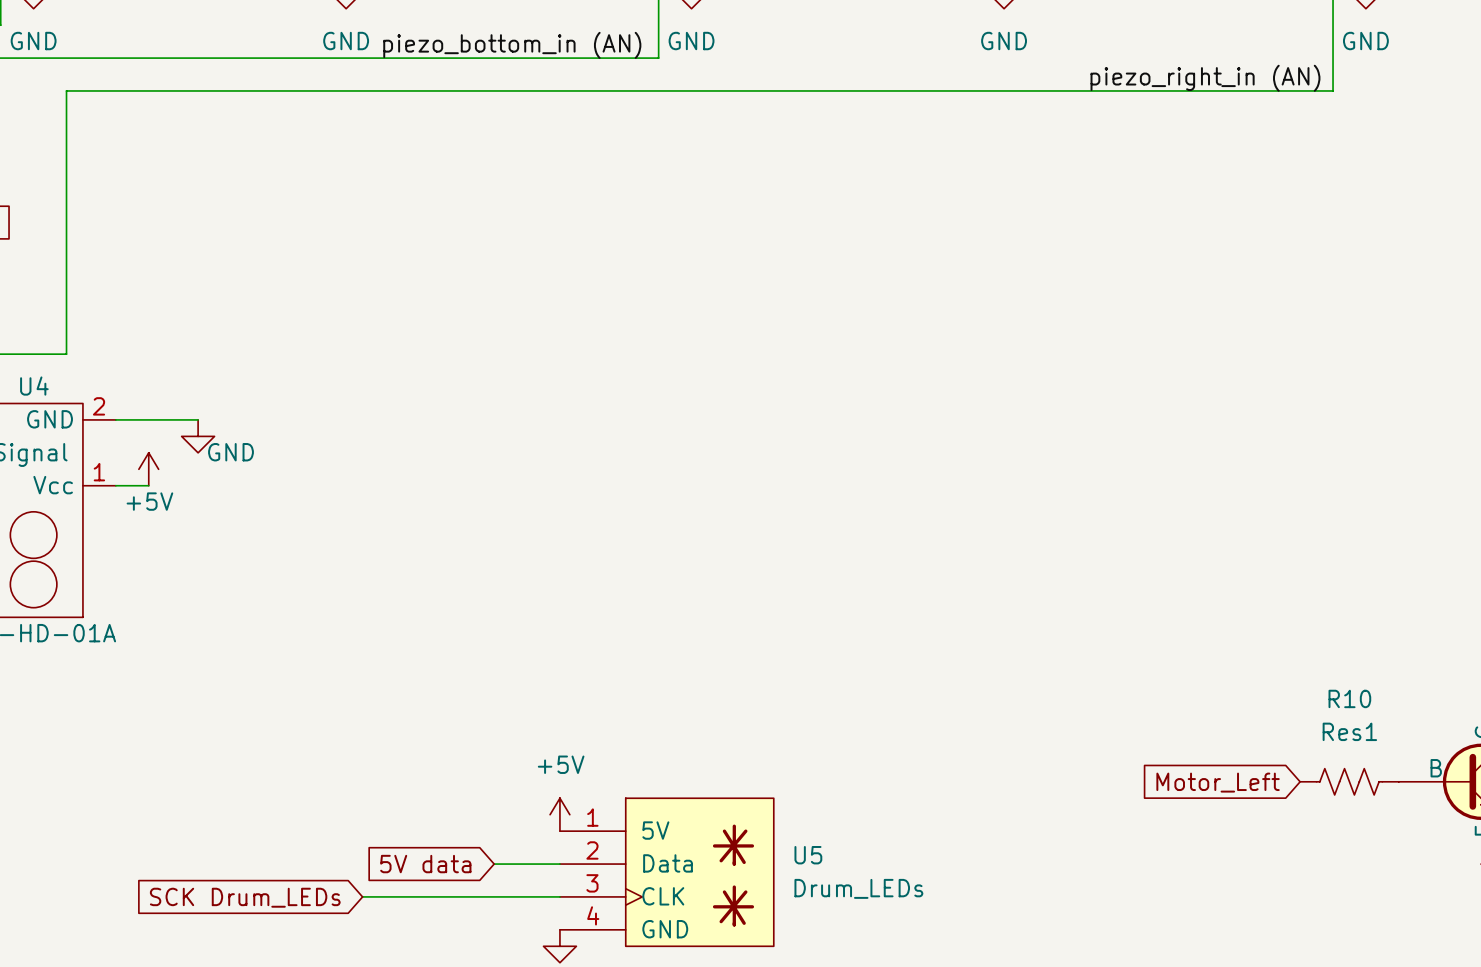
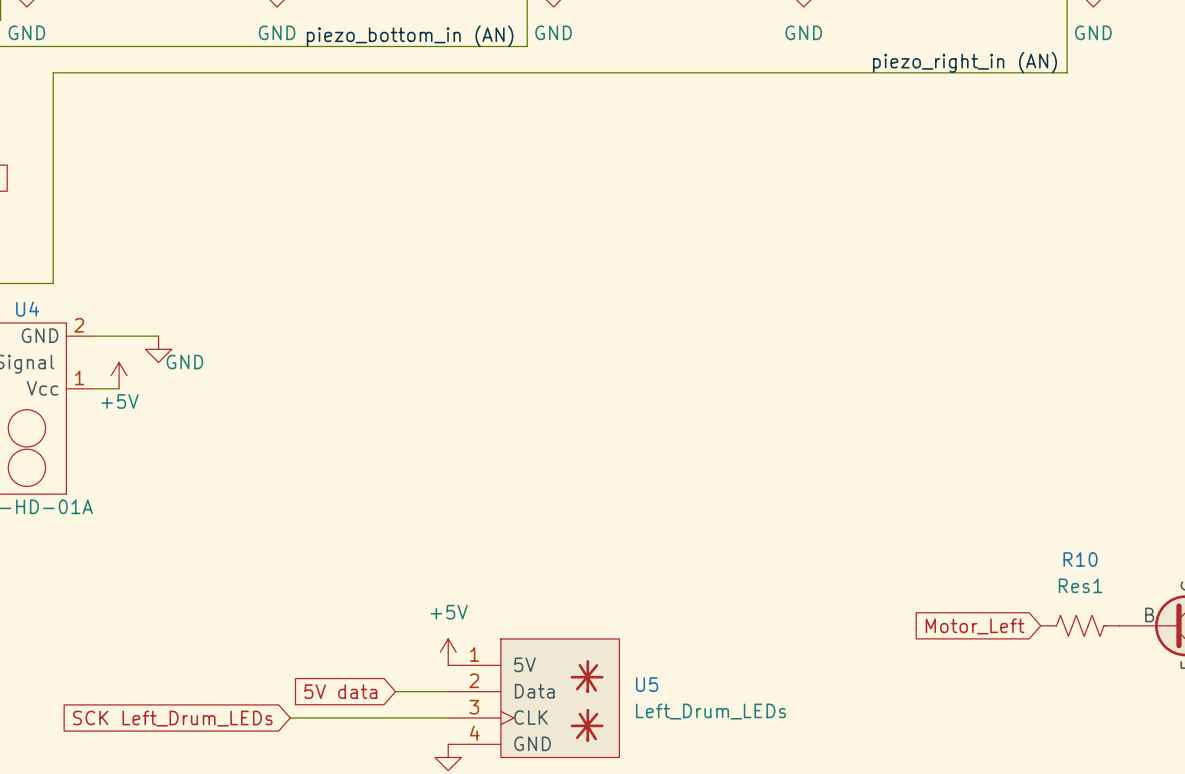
U5 value: Drum_LEDs (858, 888) -> Left_Drum_LEDs (711, 711)
global label: SCK Drum_LEDs (245, 897) -> SCK Left_Drum_LEDs (172, 718)

